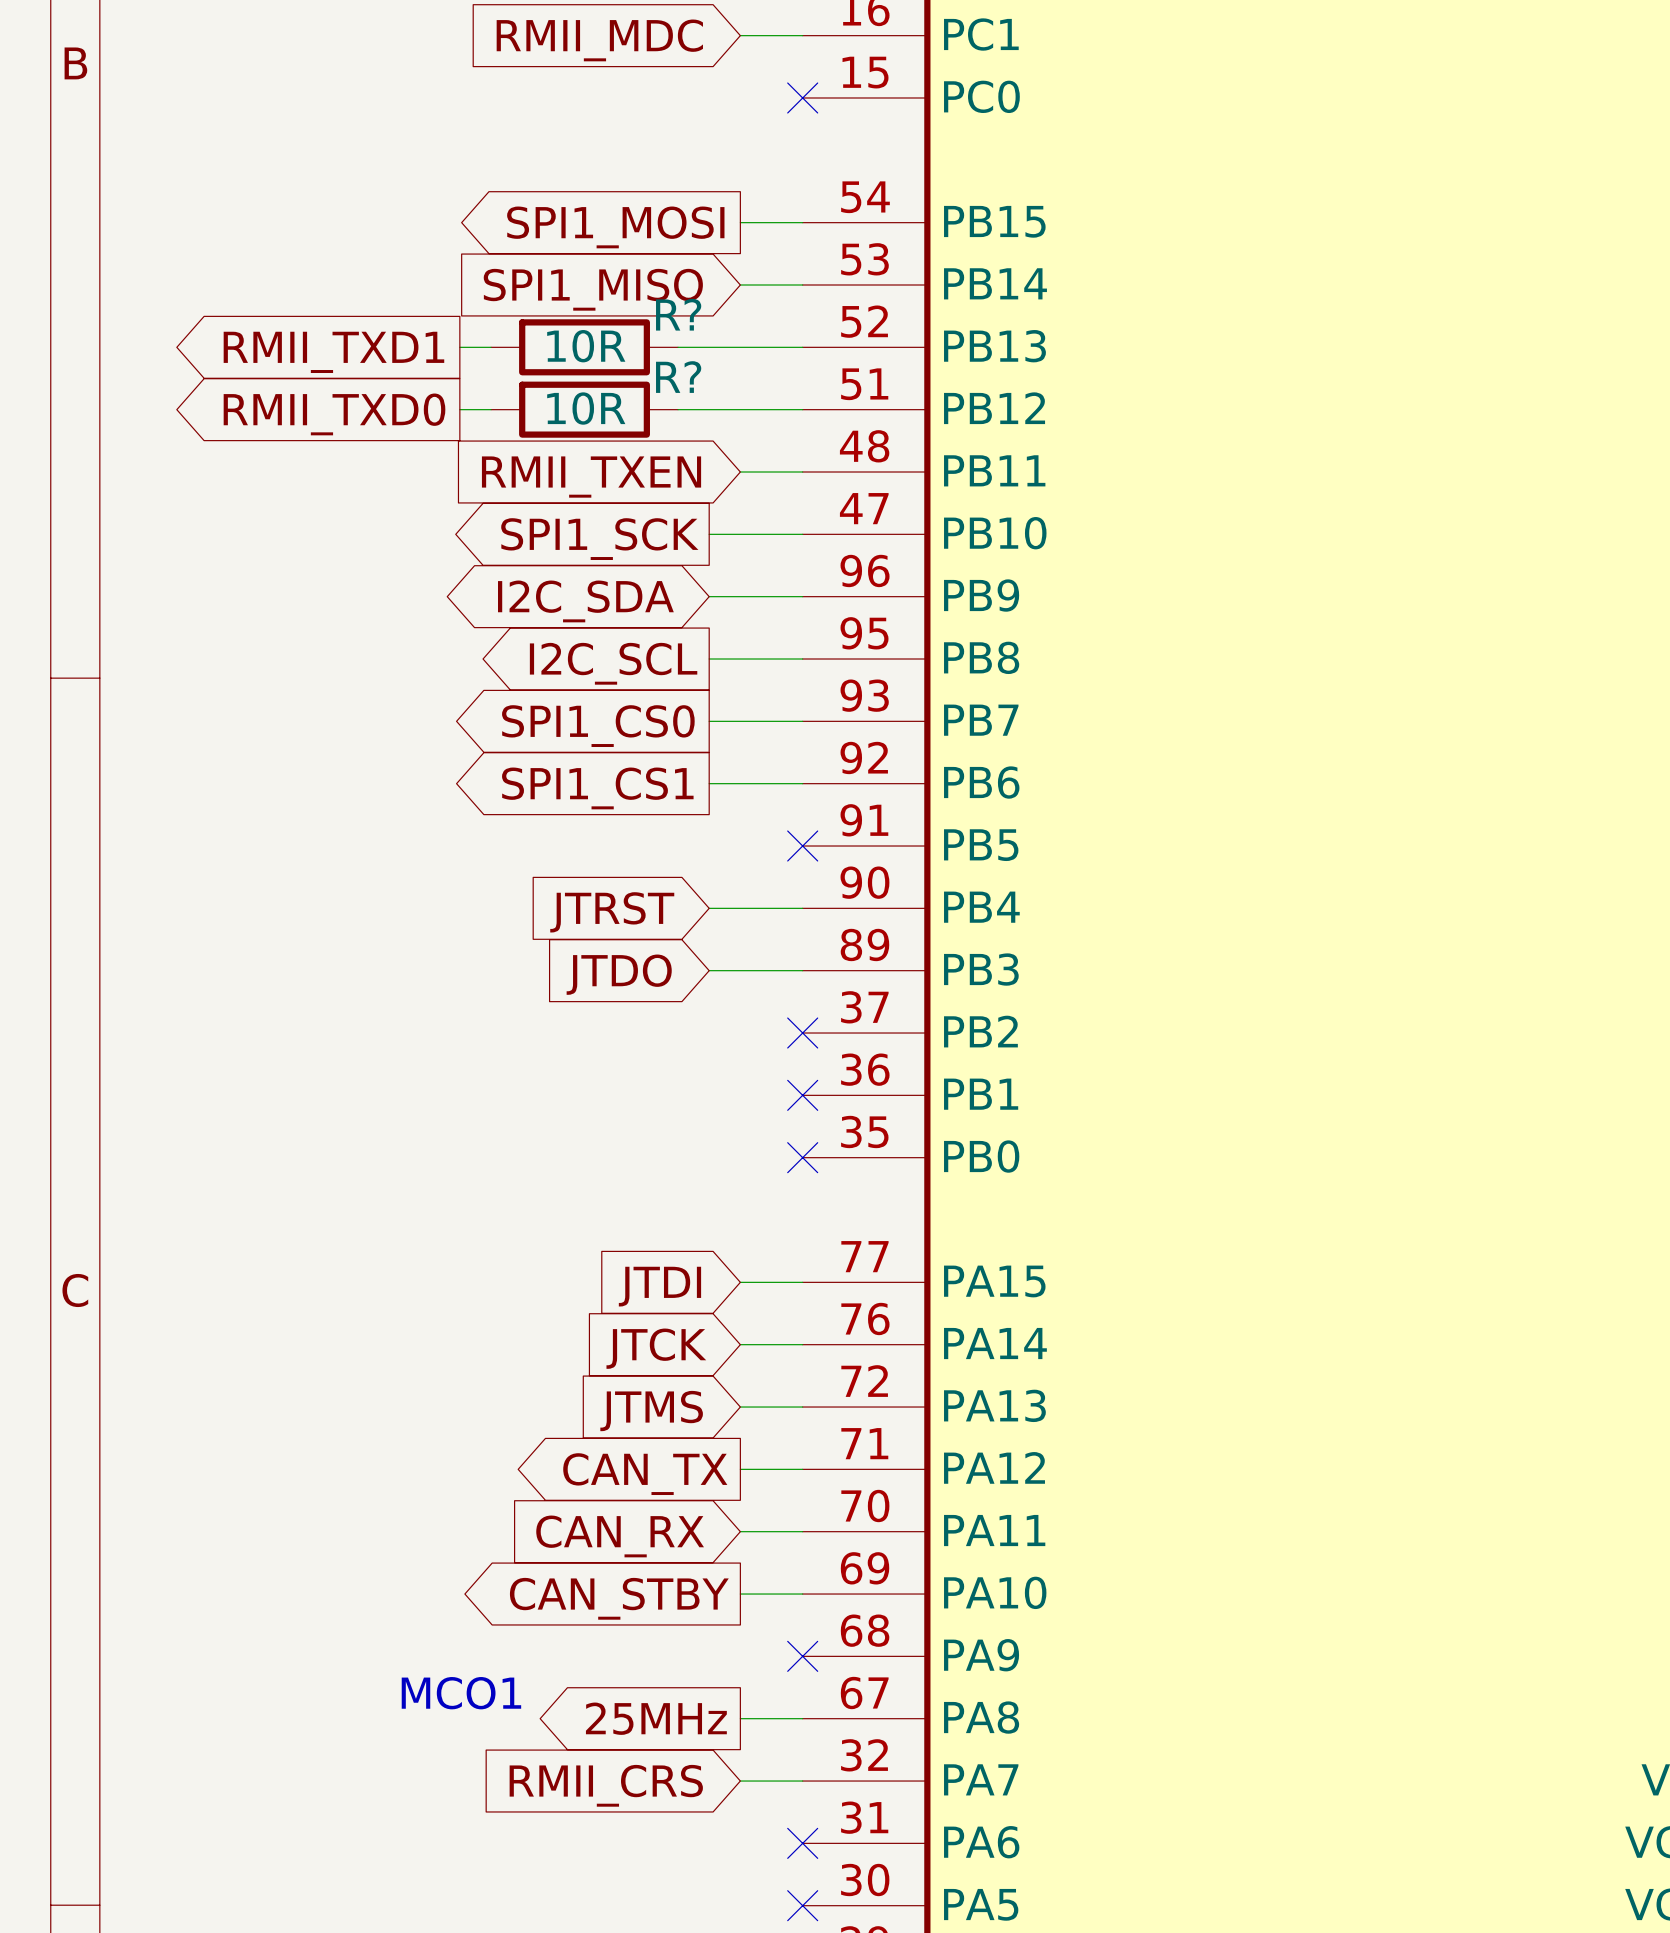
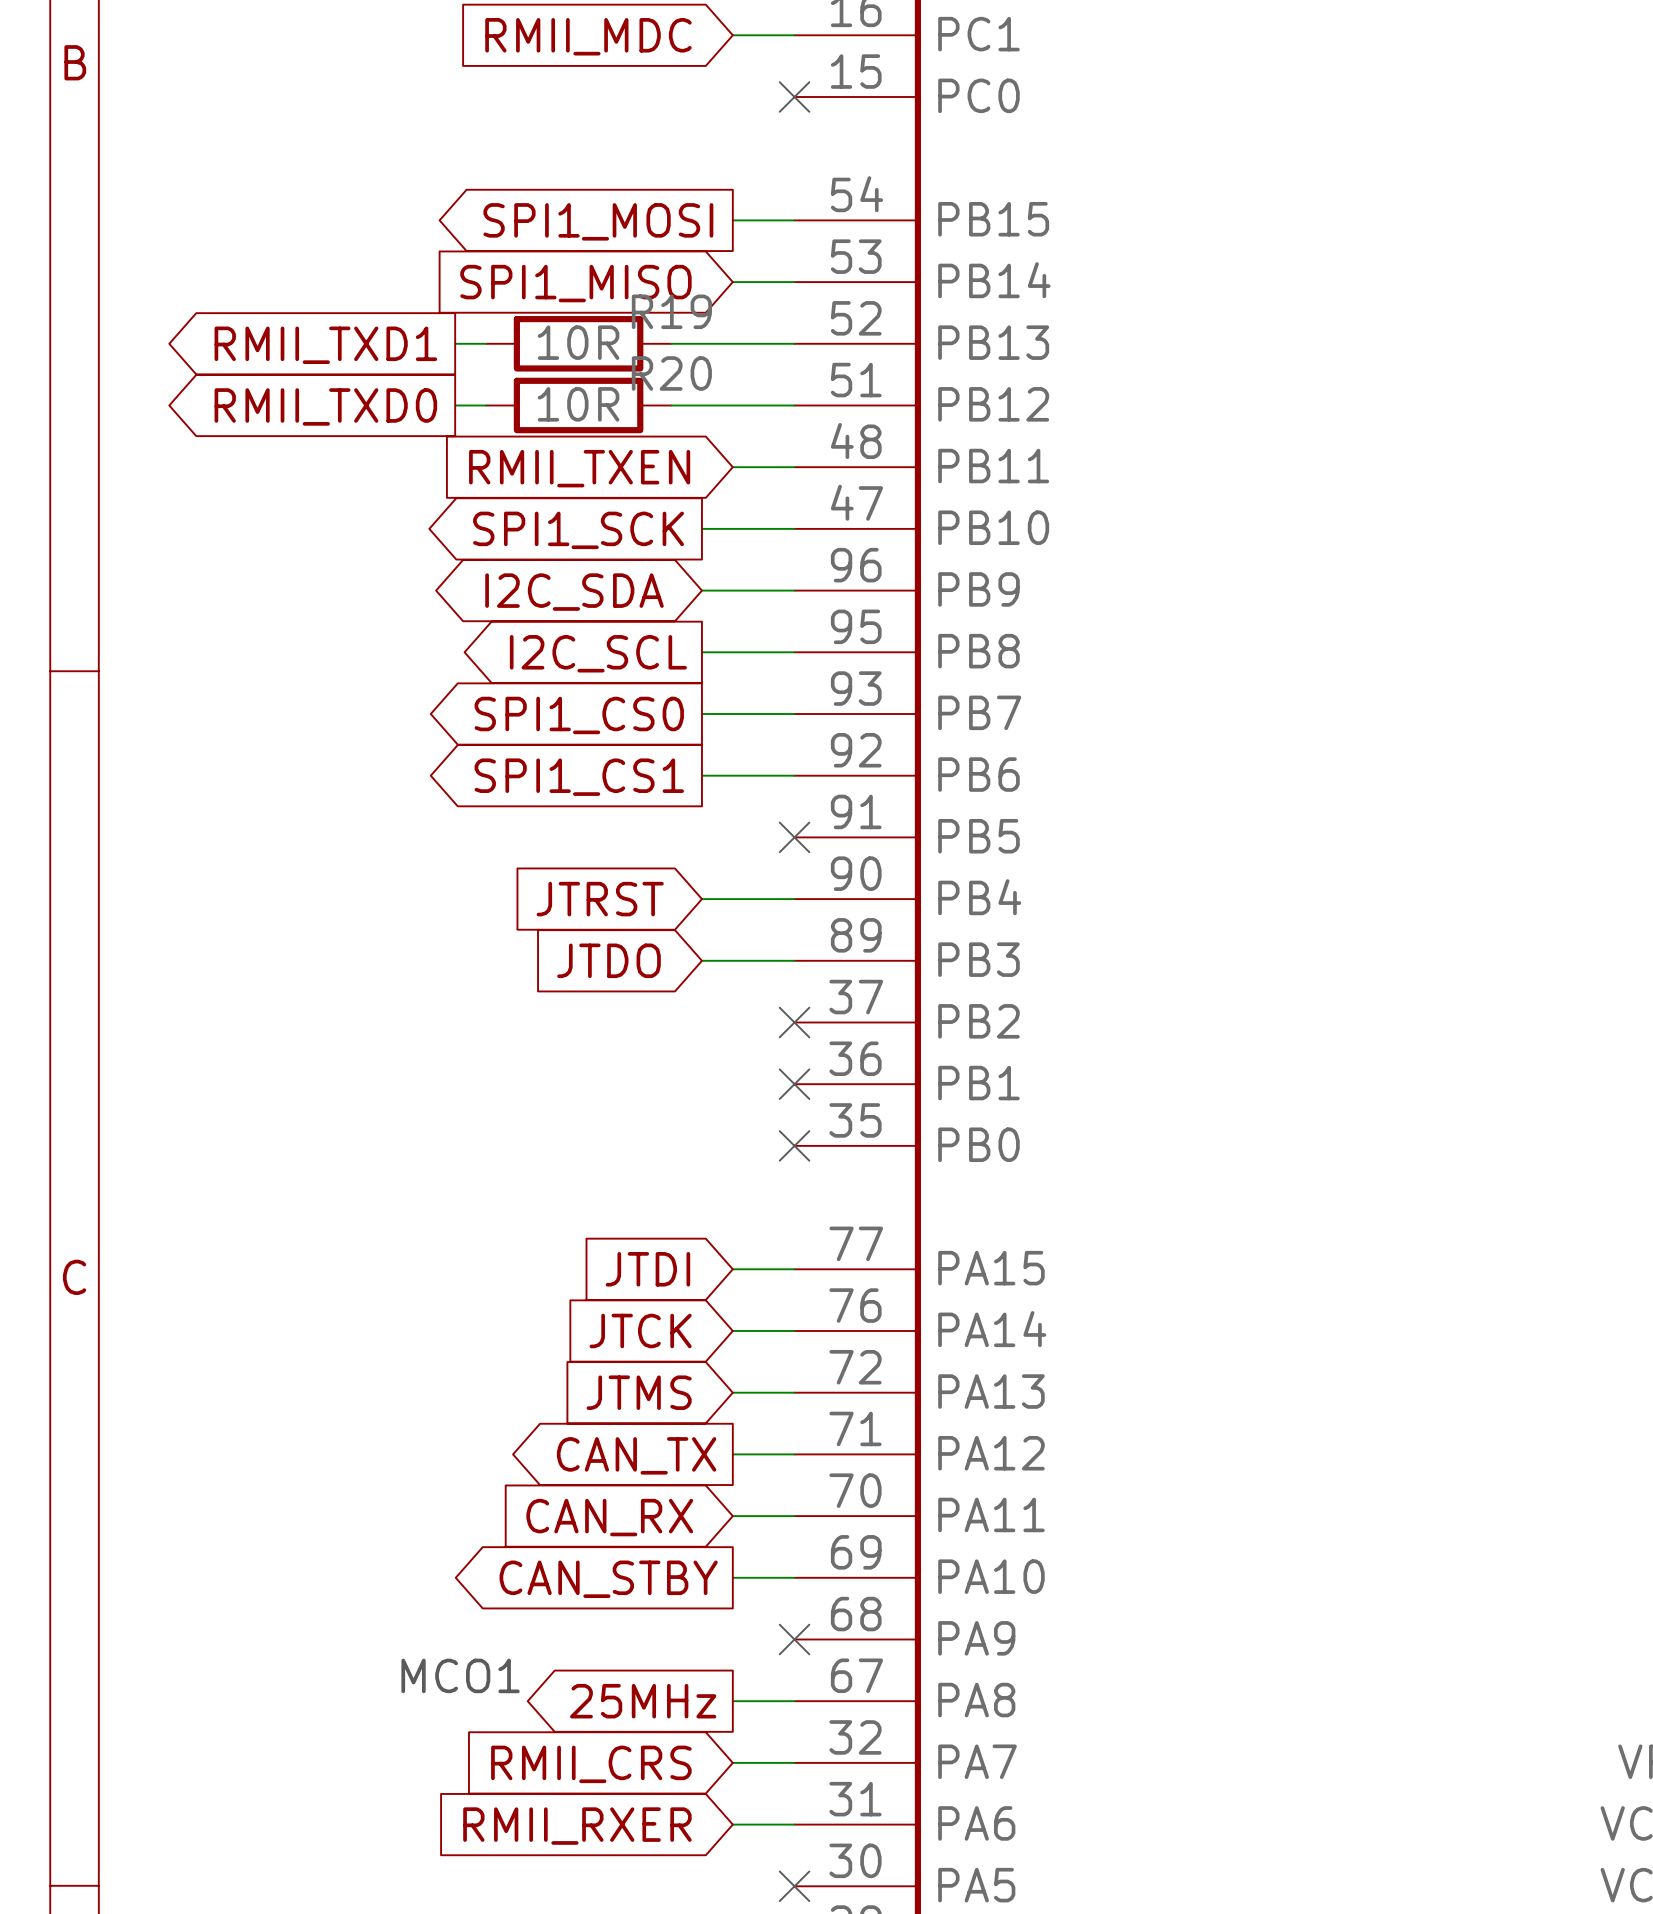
R? name: R? (678, 314) -> R19 (671, 311)
R? name: R? (678, 377) -> R20 (671, 373)
wire: none -> (732, 1824) (794, 1824)
no-connect mark: (802, 1843) -> none
global label: none -> RMII_RXER (577, 1826)

